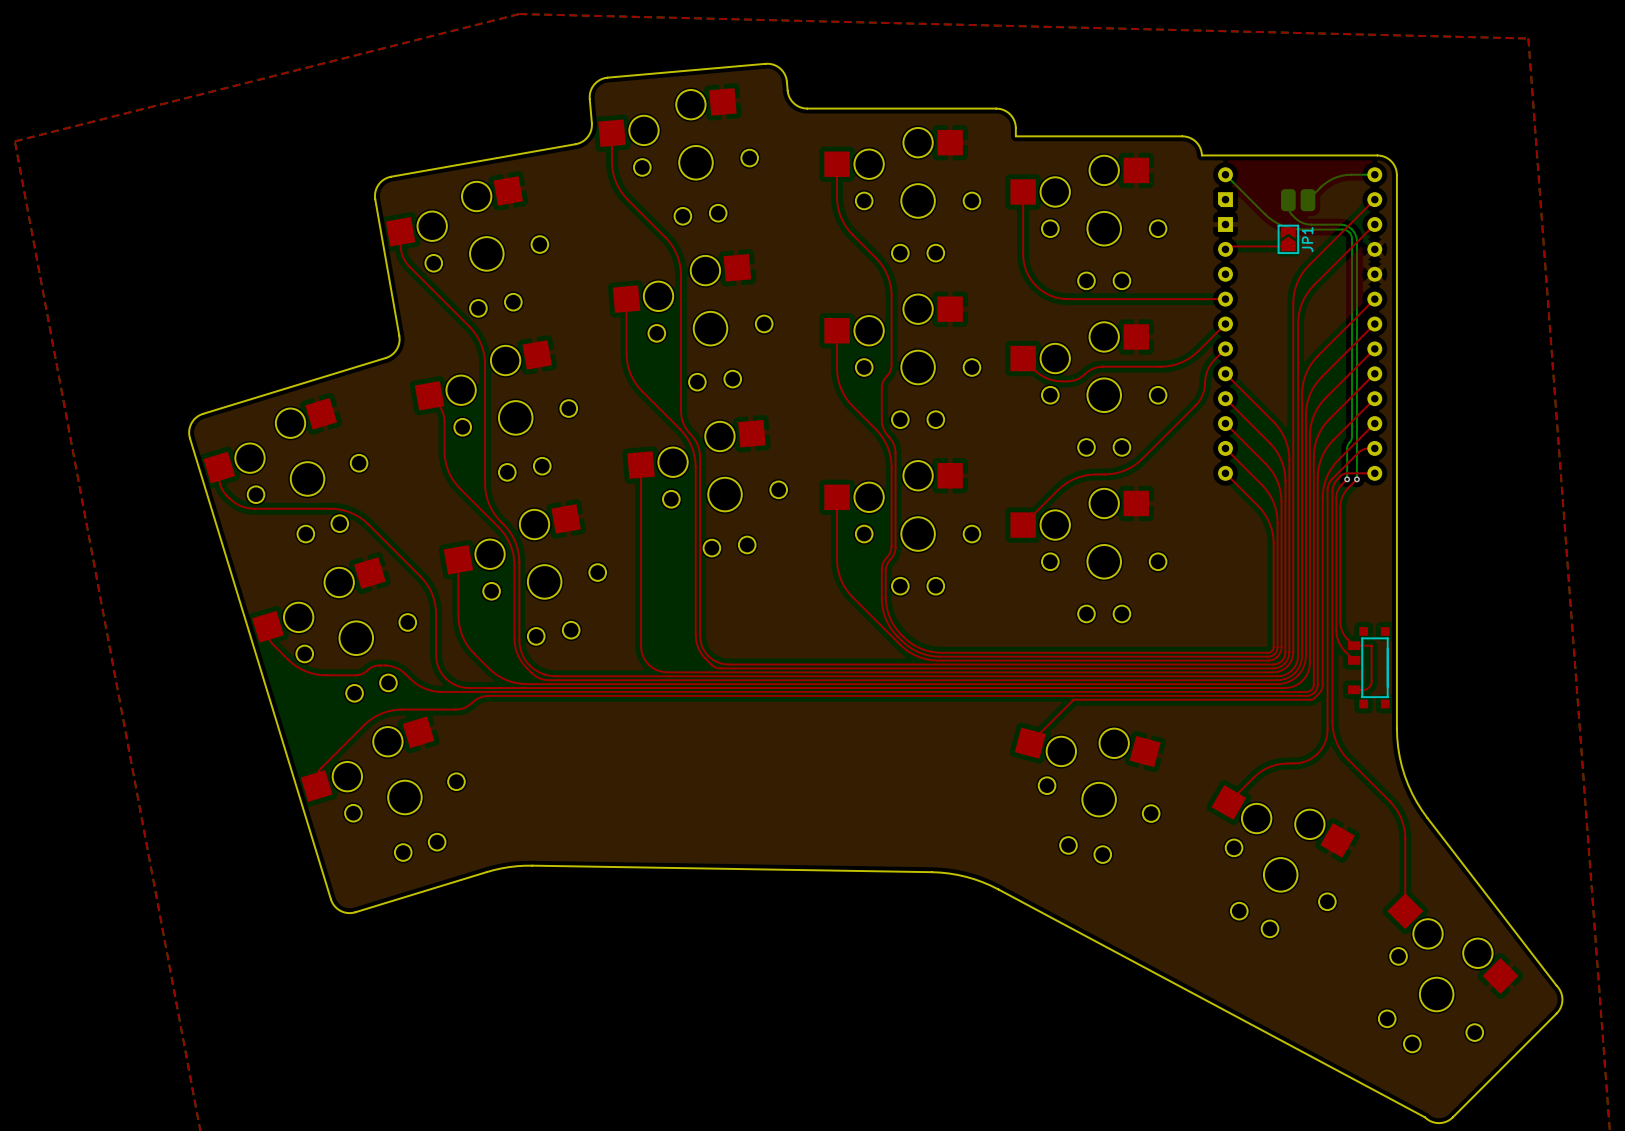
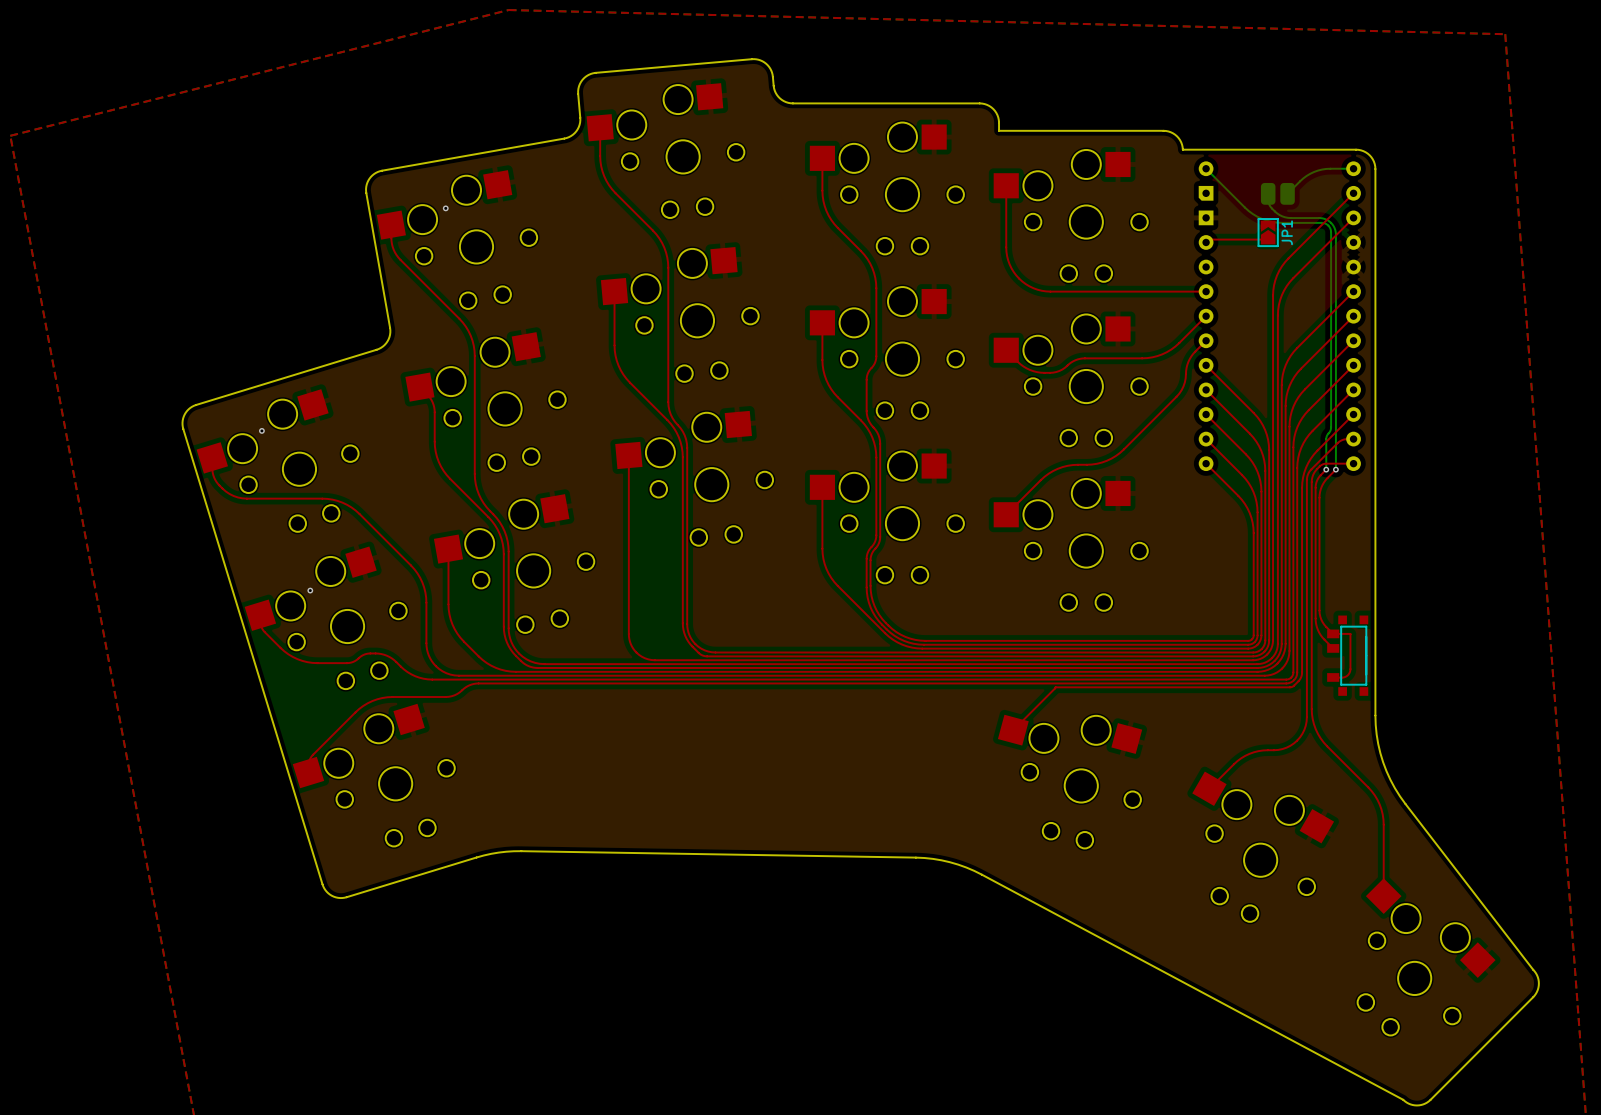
via: none -> (445, 208)
via: none -> (261, 430)
via: none -> (310, 590)

